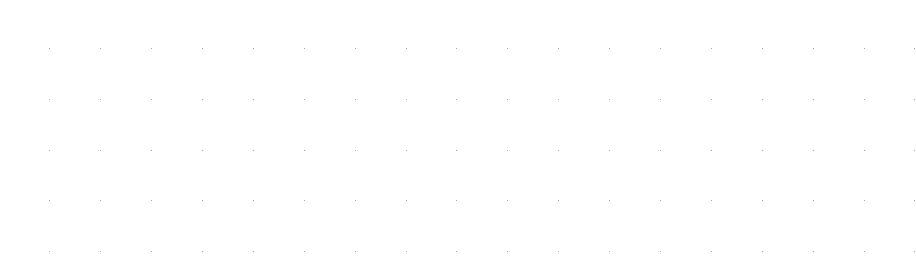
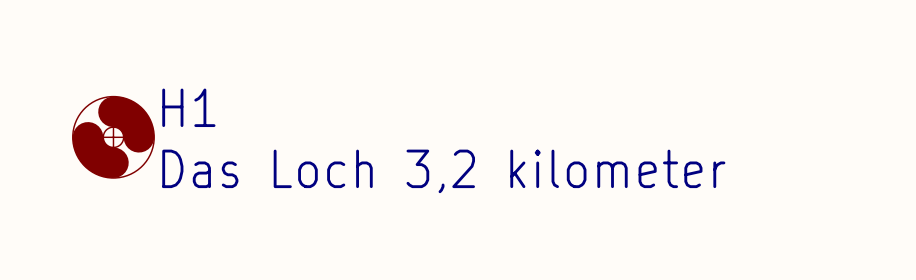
H1: none -> Das Loch 3,2 kilometer (113, 137)

